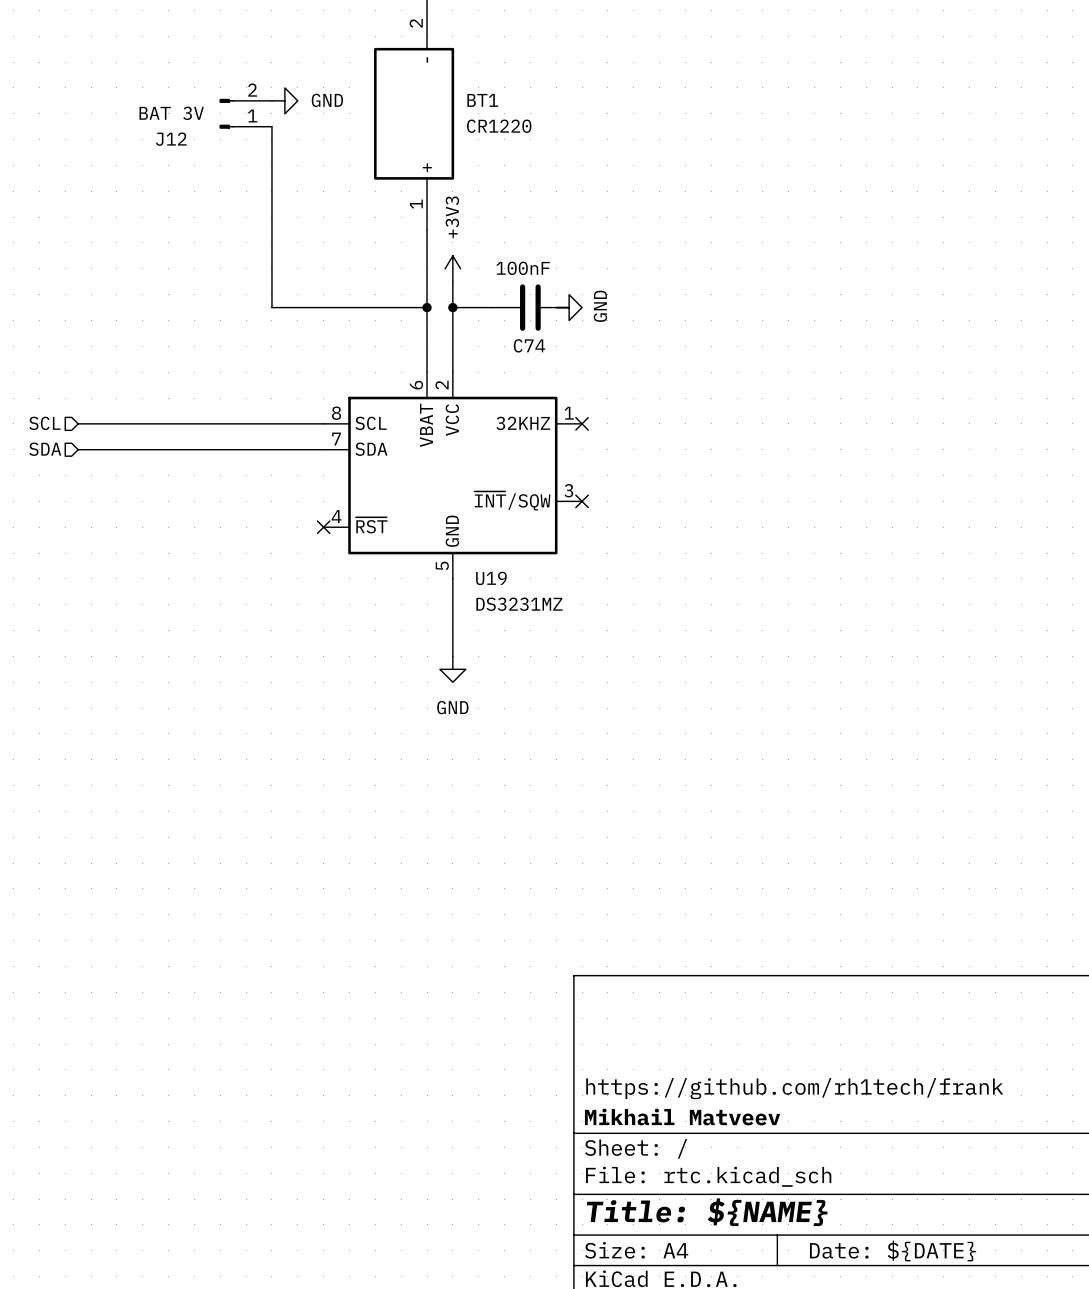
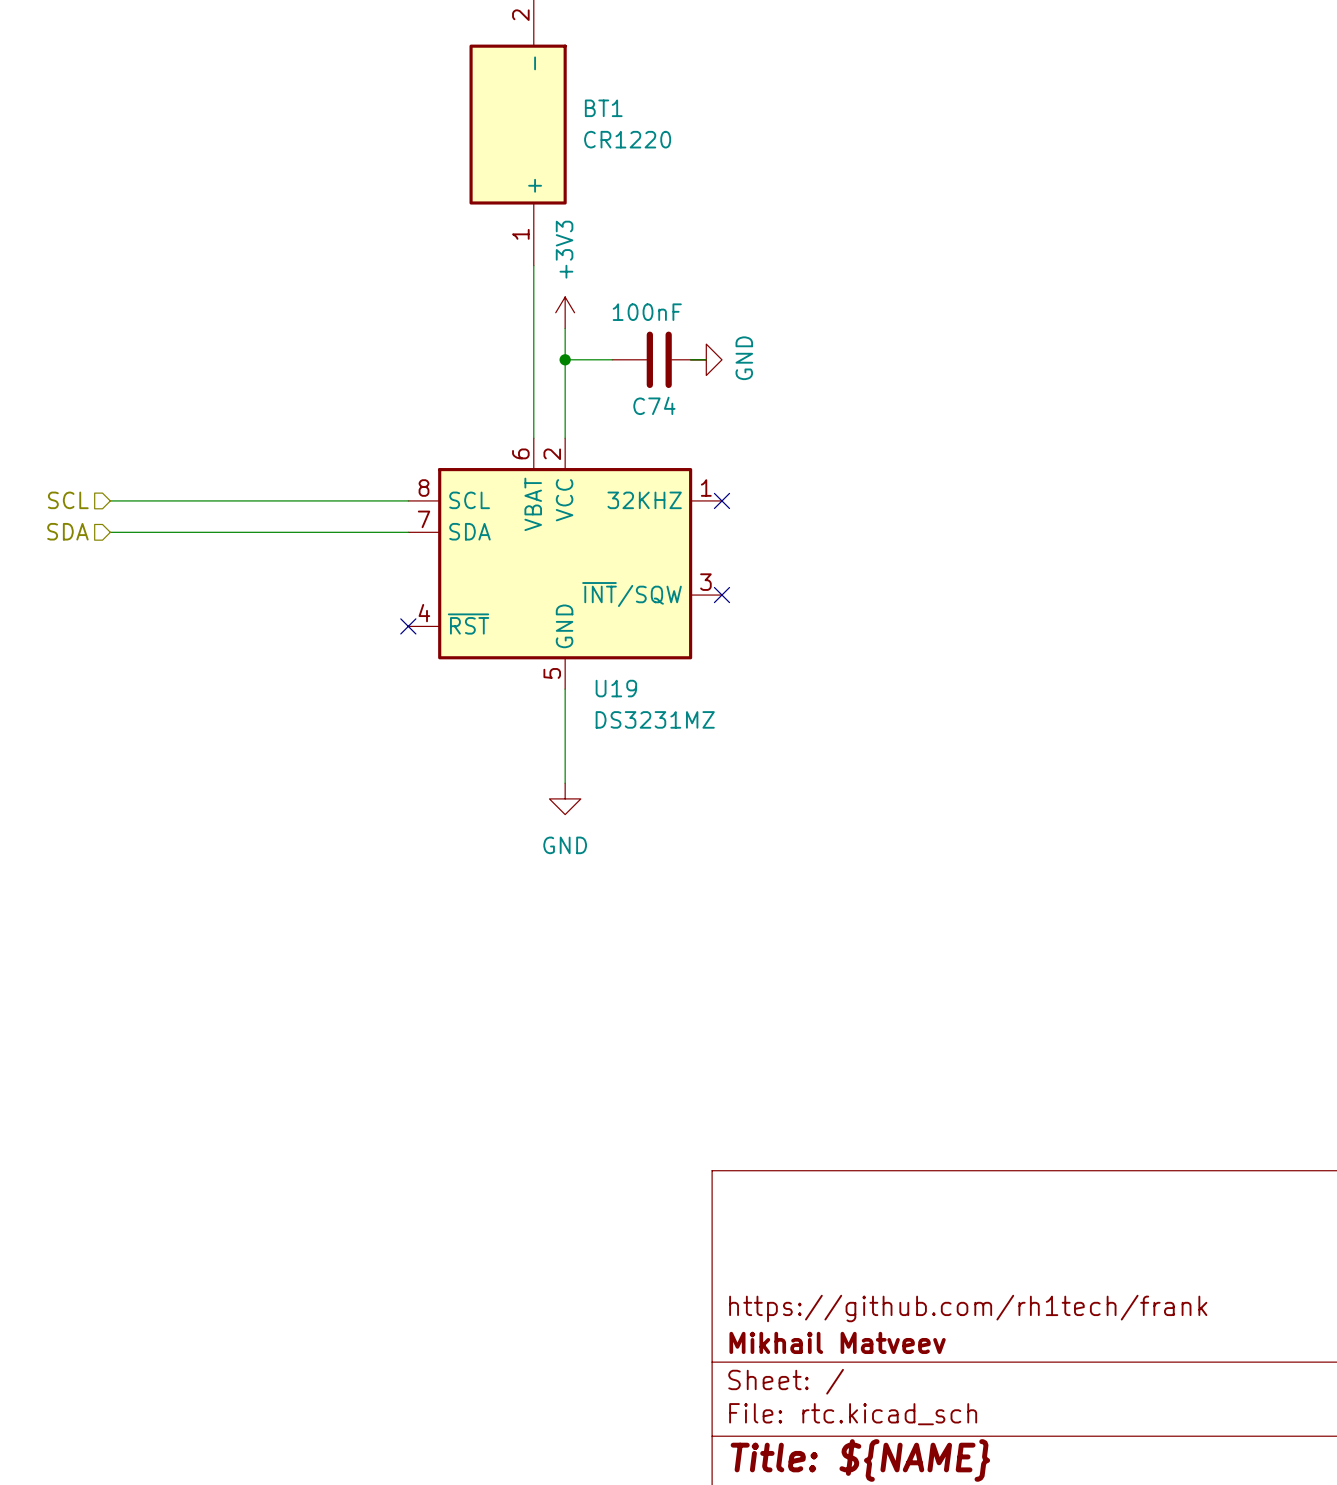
power symbol: GND (284, 100) -> none
J12: BAT 3V (245, 113) -> none
wire: (271, 126) (271, 307) (427, 307) -> none
junction: (427, 307) -> none

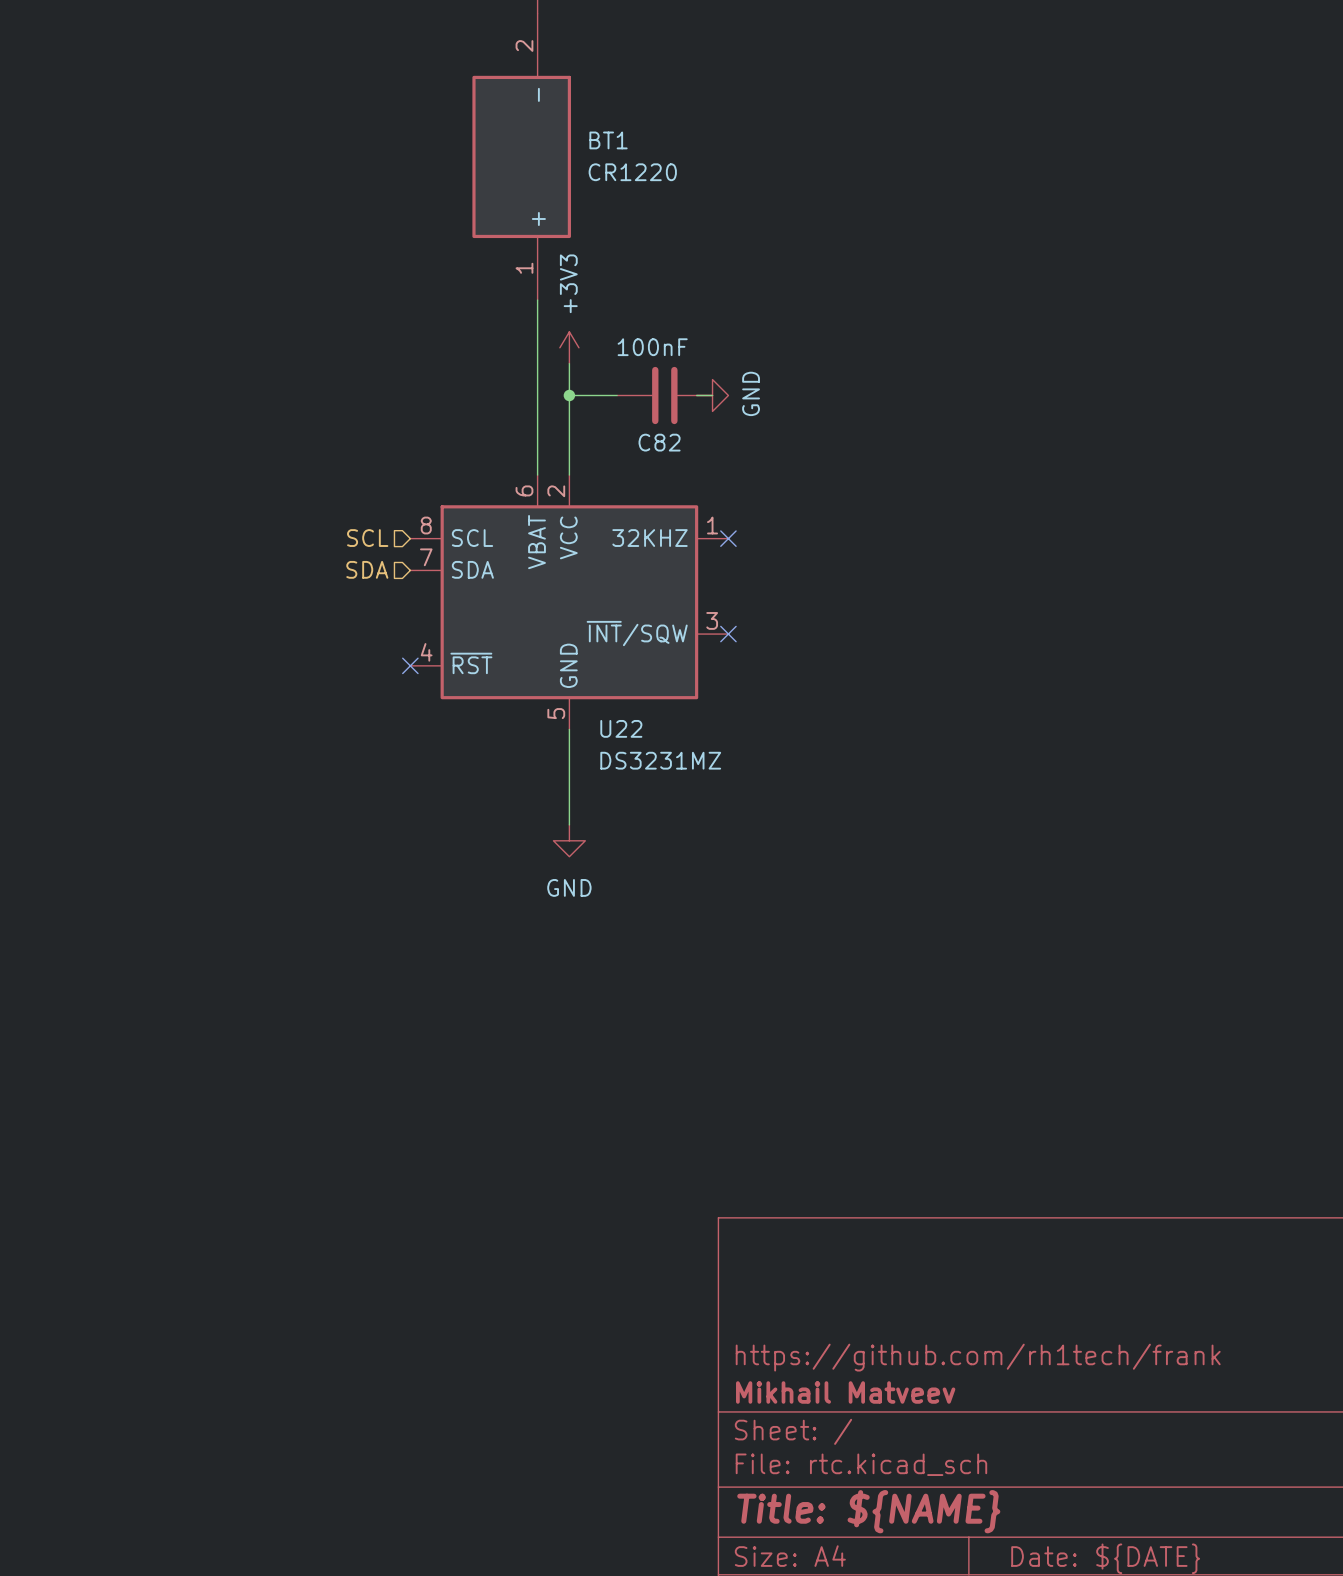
C74 name: C74 (654, 405) -> C82 (659, 442)
hierarchical label position: SCL (68, 500) -> SCL (367, 538)
wire: (110, 500) (408, 500) -> none
hierarchical label position: SDA (67, 531) -> SDA (367, 569)
wire: (110, 532) (408, 532) -> none
U19 name: U19 (616, 688) -> U22 (621, 728)

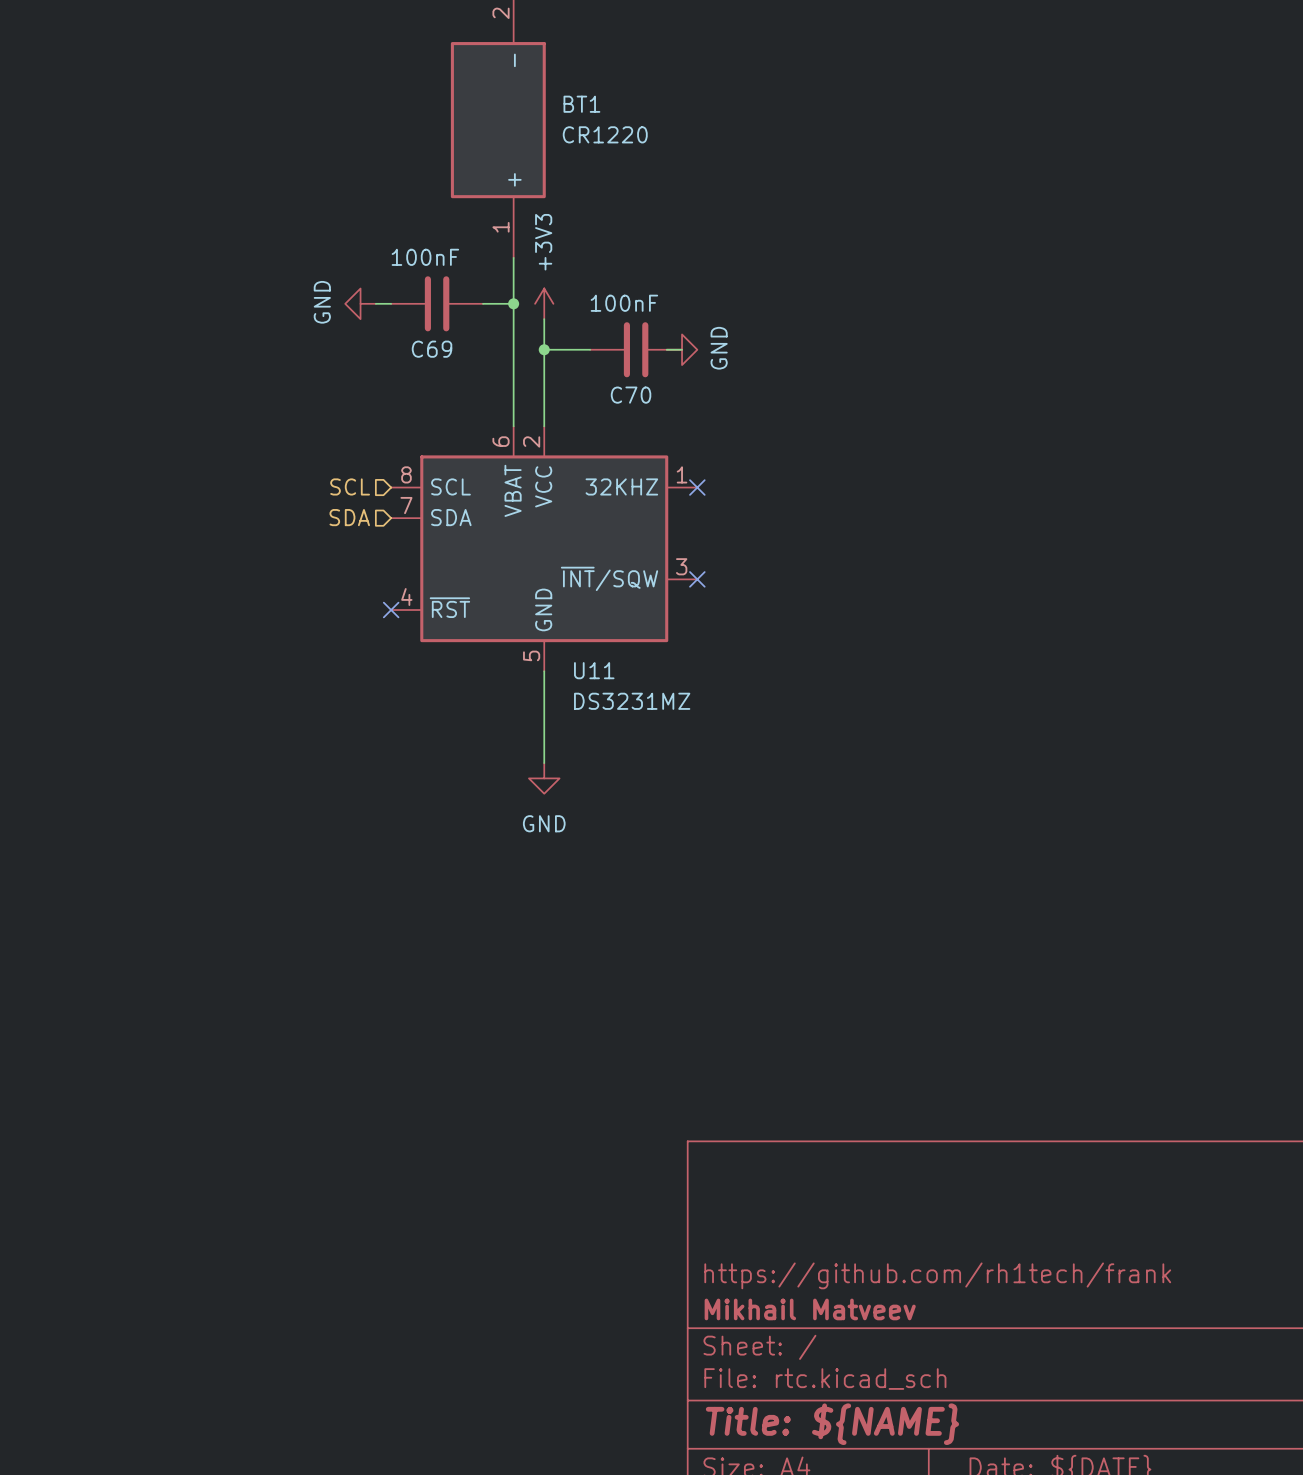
power symbol: none -> GND (360, 303)
wire: none -> (375, 303) (391, 303)
C69: none -> 100nF (437, 303)
wire: none -> (483, 303) (513, 303)
junction: none -> (513, 303)
C82 name: C82 (659, 442) -> C70 (631, 395)
U22 name: U22 (621, 728) -> U11 (594, 670)

